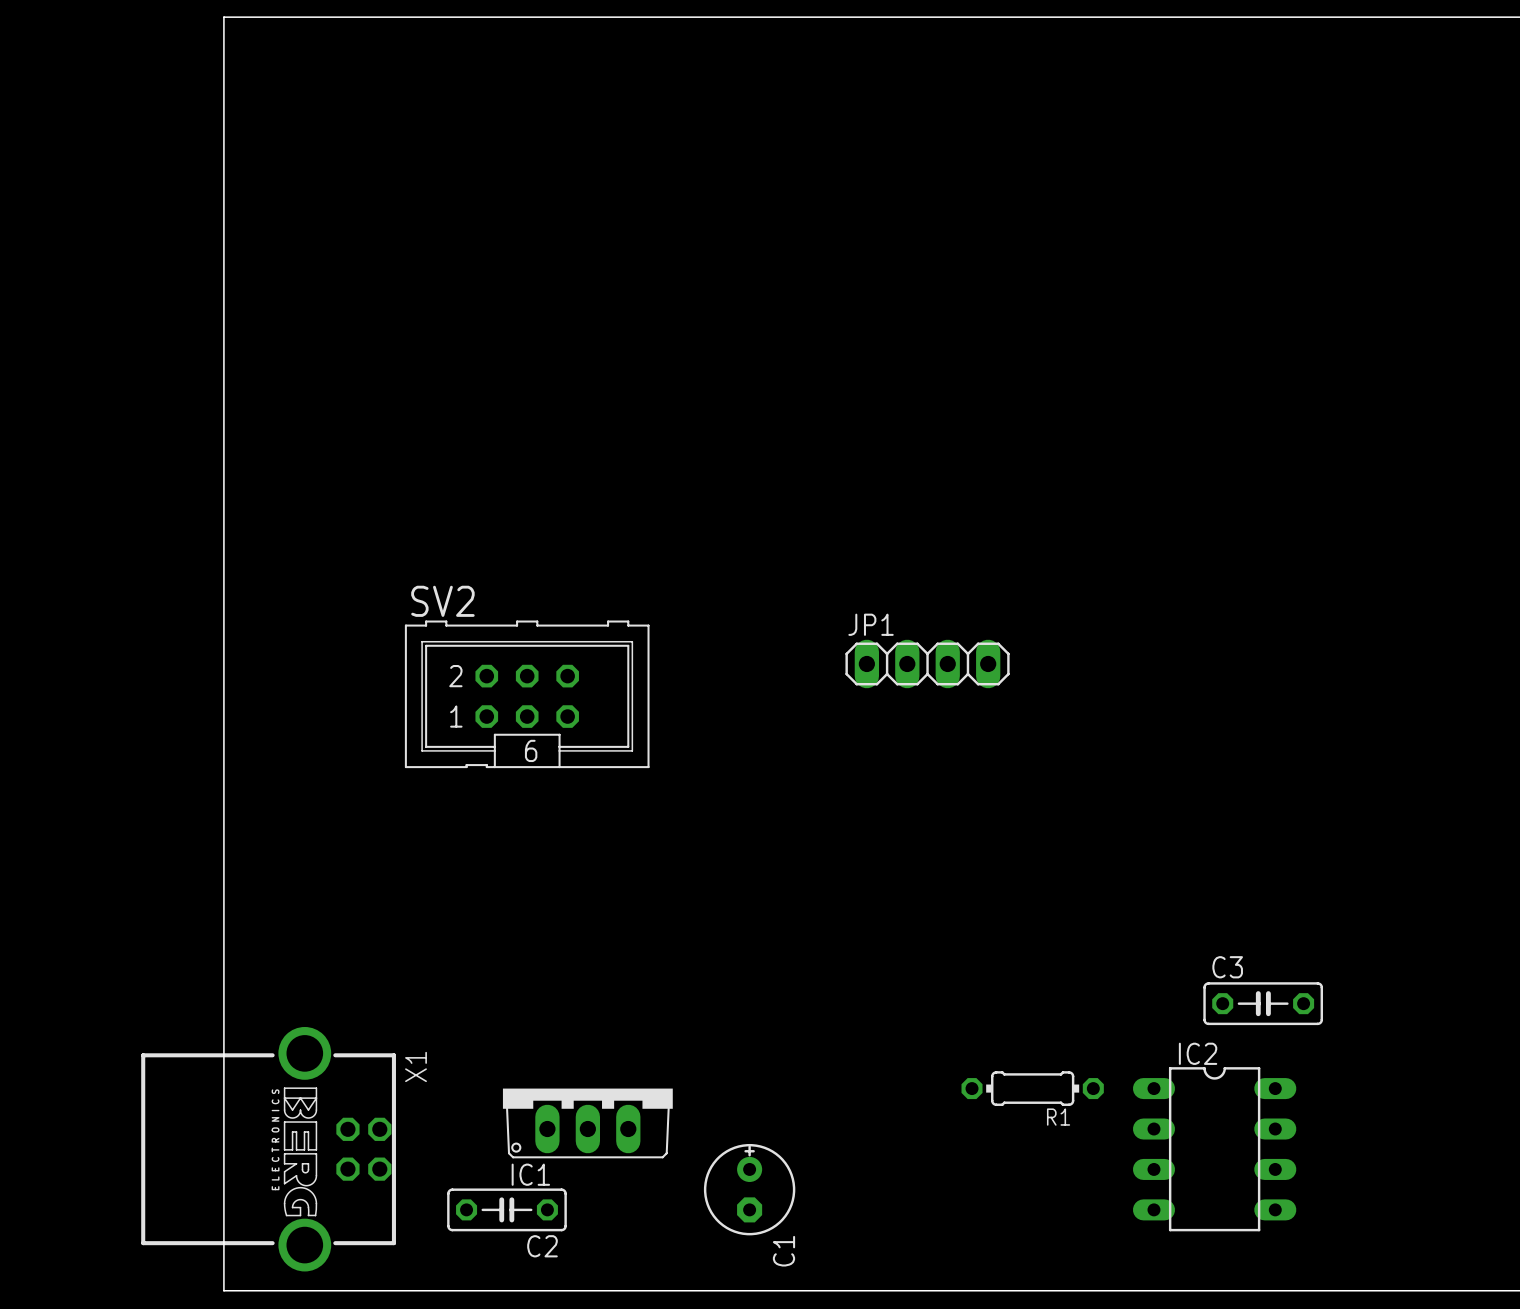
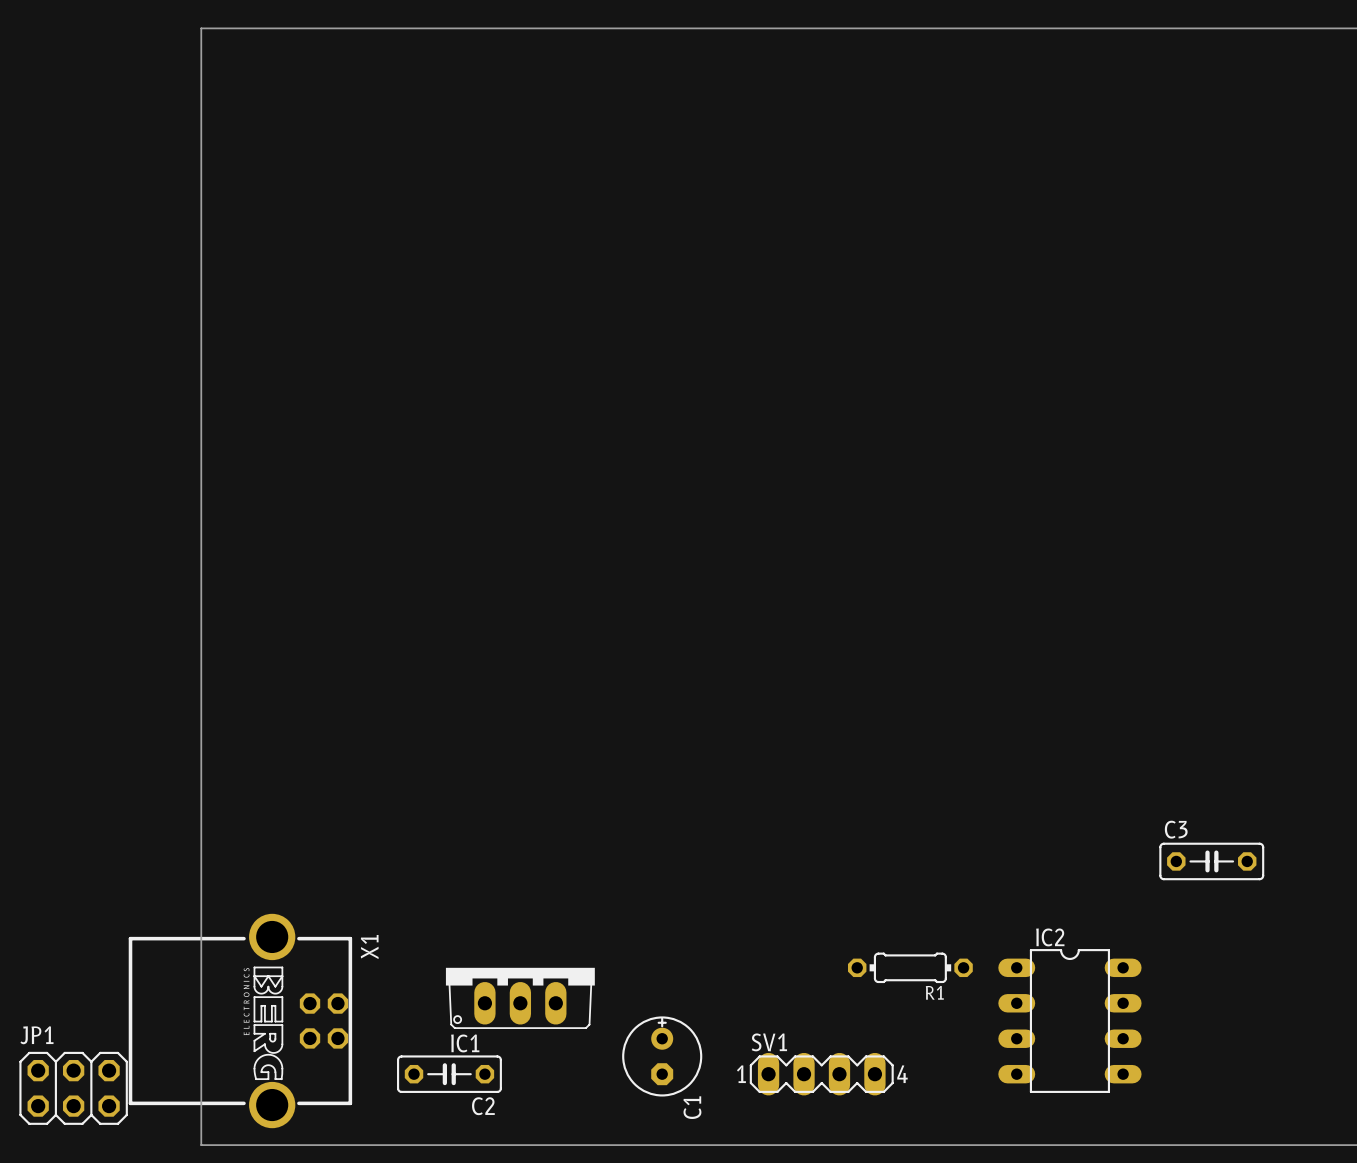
JP1 footprint: [845, 639, 1010, 689] -> [19, 1051, 128, 1125]
SV2: (527, 694) -> none
C3 position: (1263, 1003) -> (1211, 861)
SV1: none -> (821, 1074)

